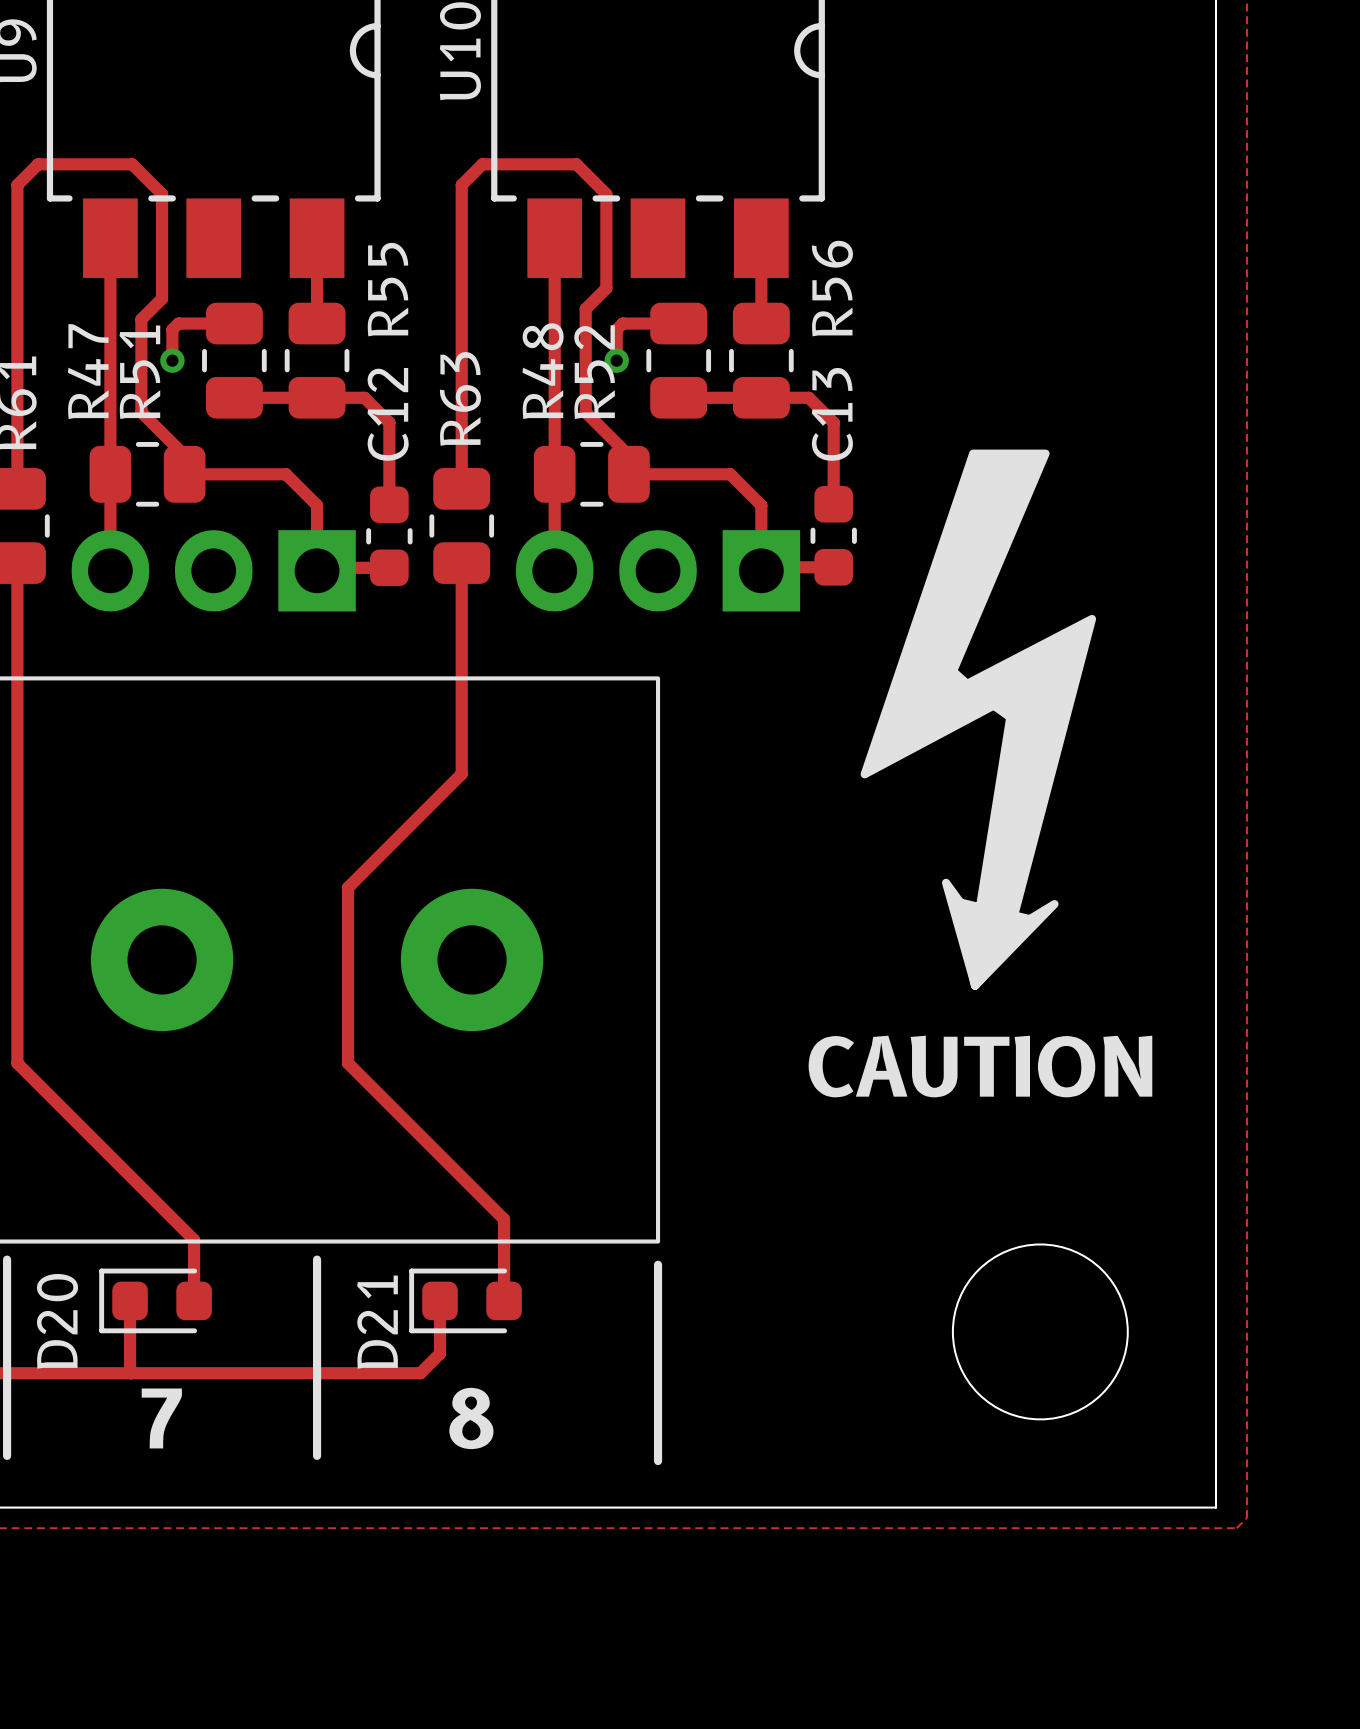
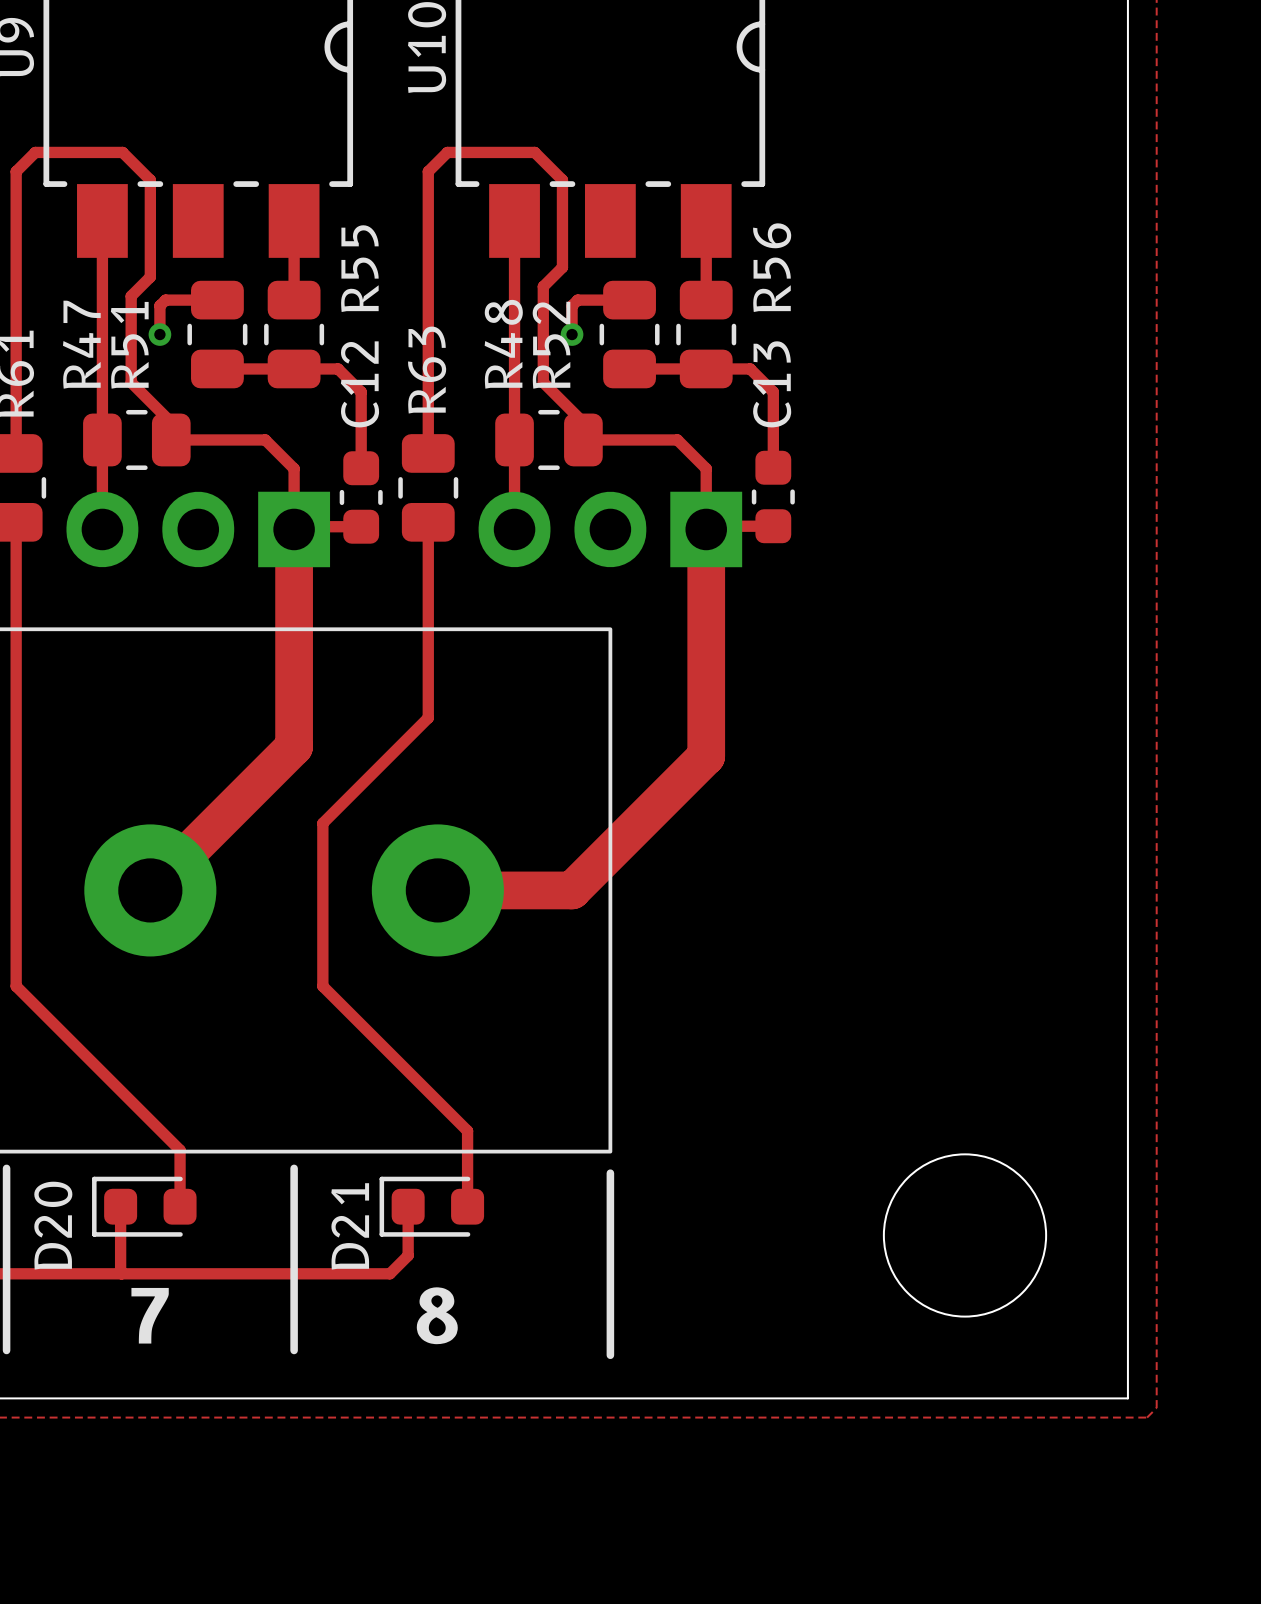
drawing: [860, 449, 1097, 990] -> none
track: none -> (294, 529) (294, 746) (150, 890)
track: none -> (706, 529) (706, 756) (572, 890) (437, 890)
text: CAUTION (980, 1066) -> none

